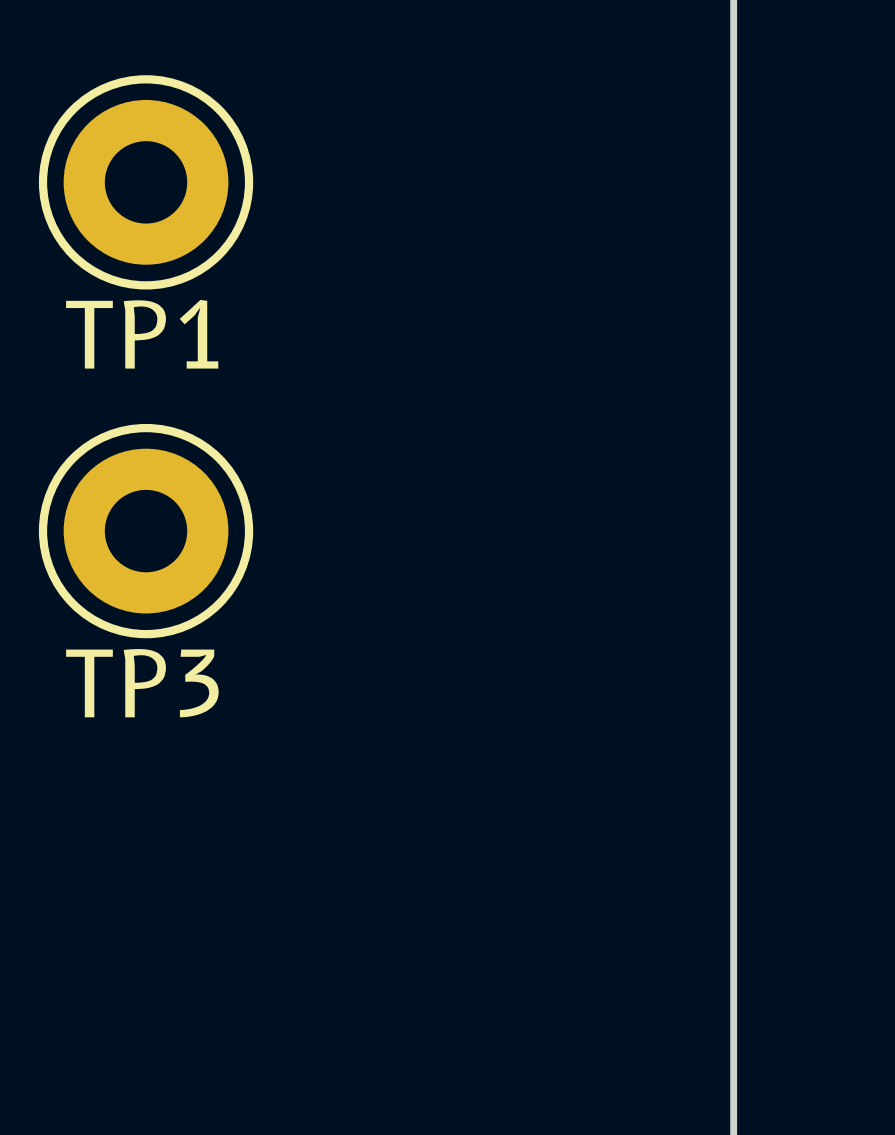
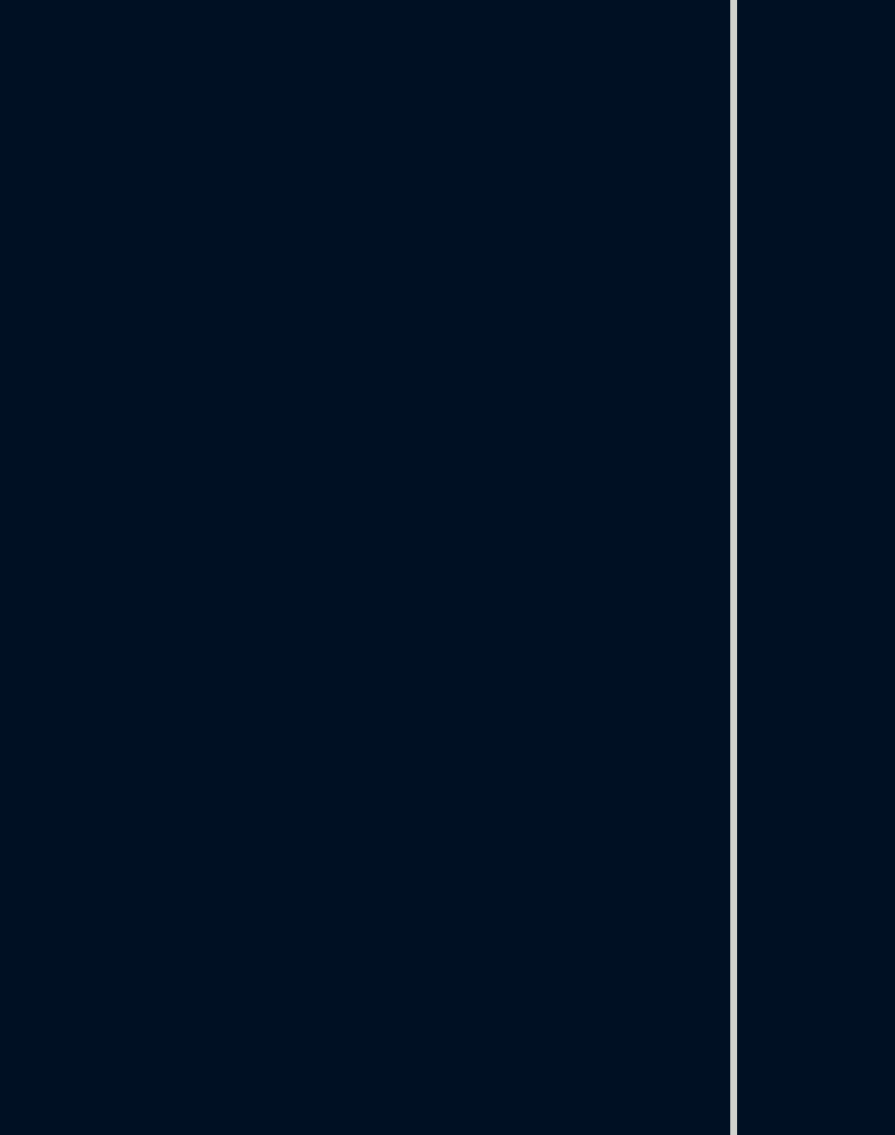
TP1: (146, 182) -> none
TP3: (146, 531) -> none

